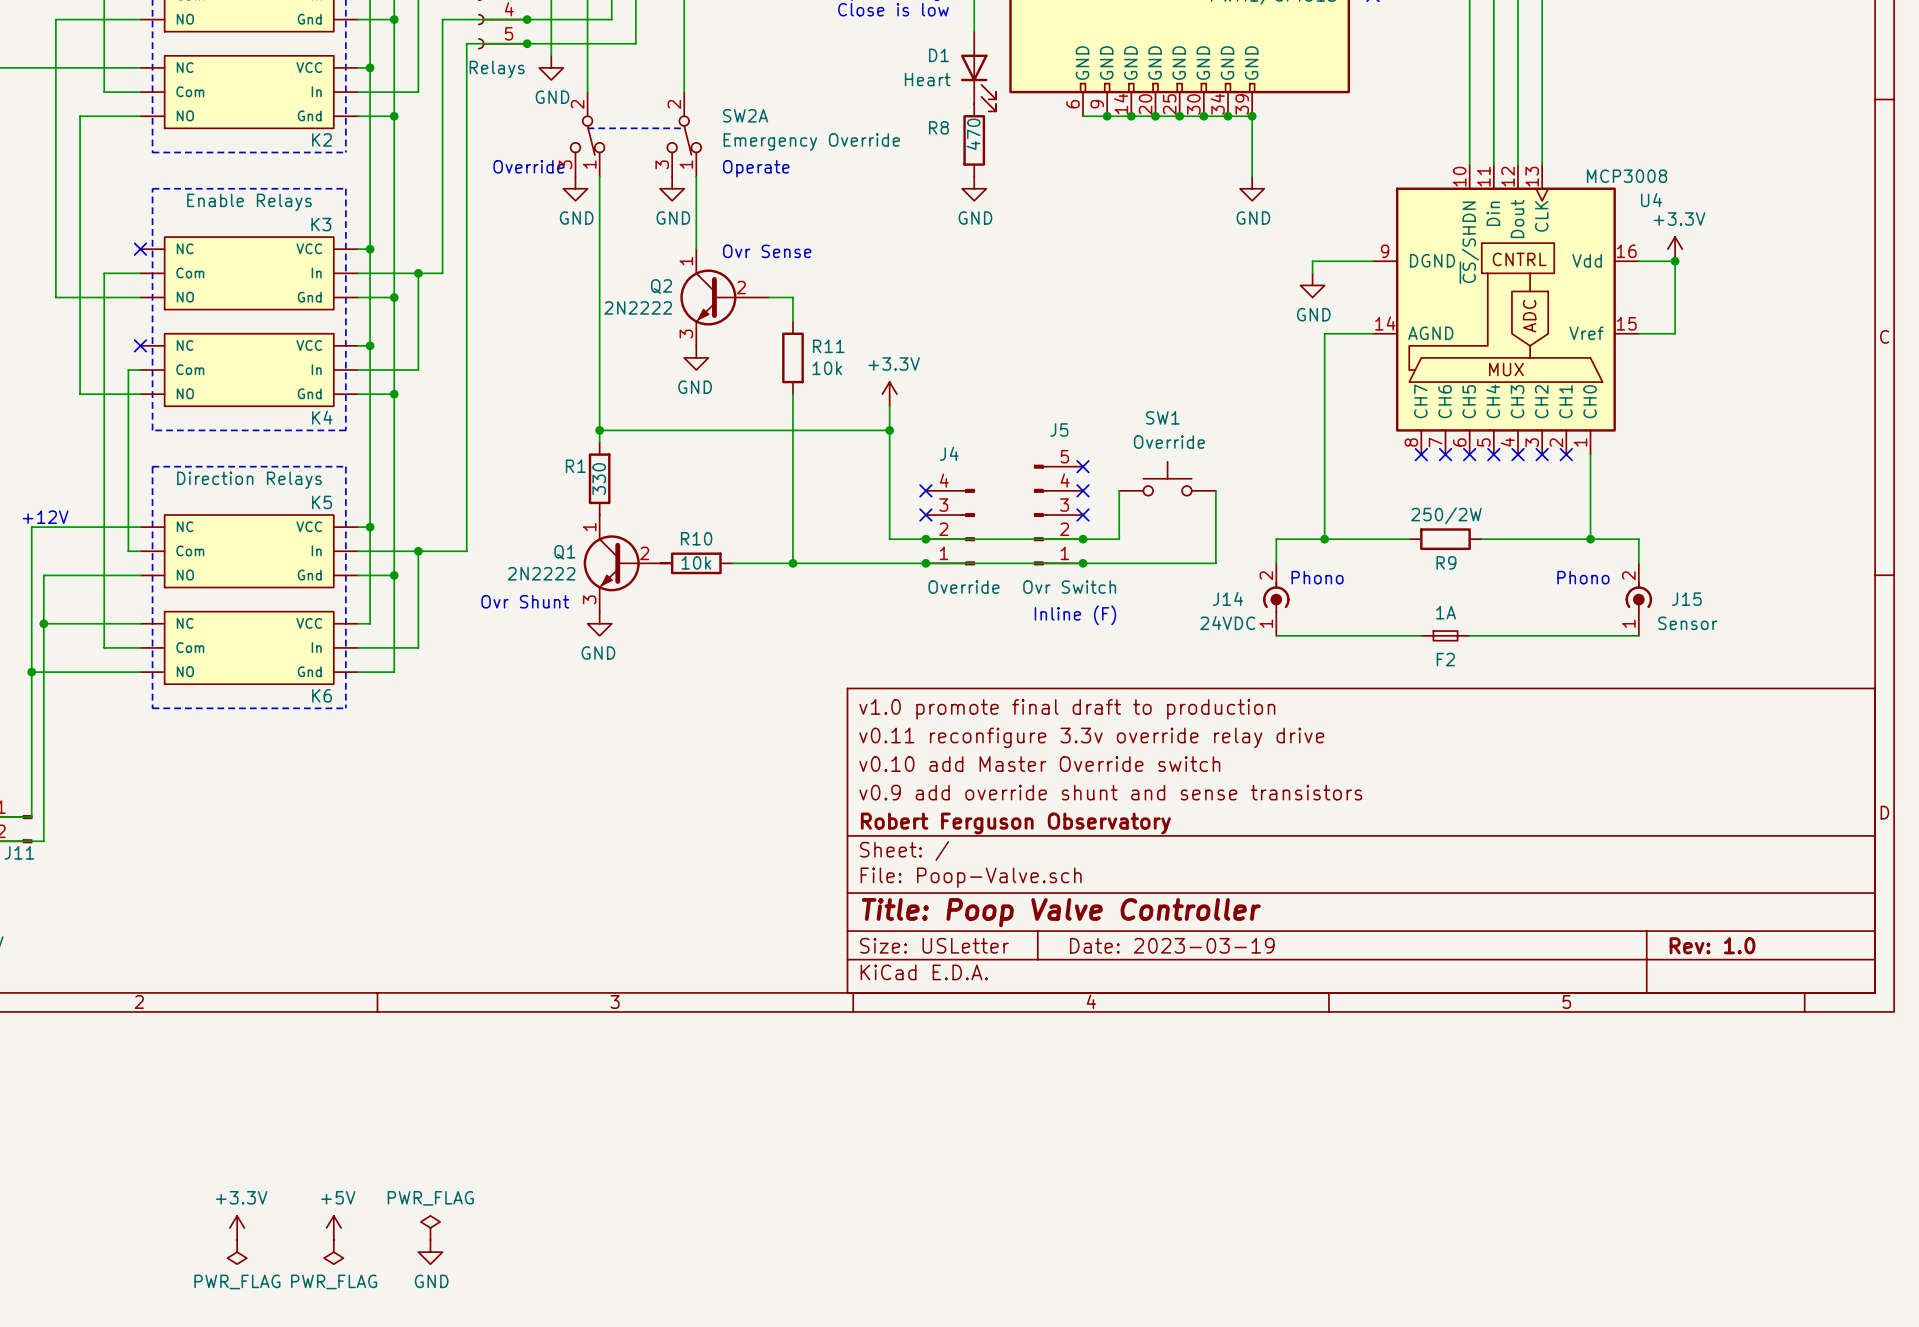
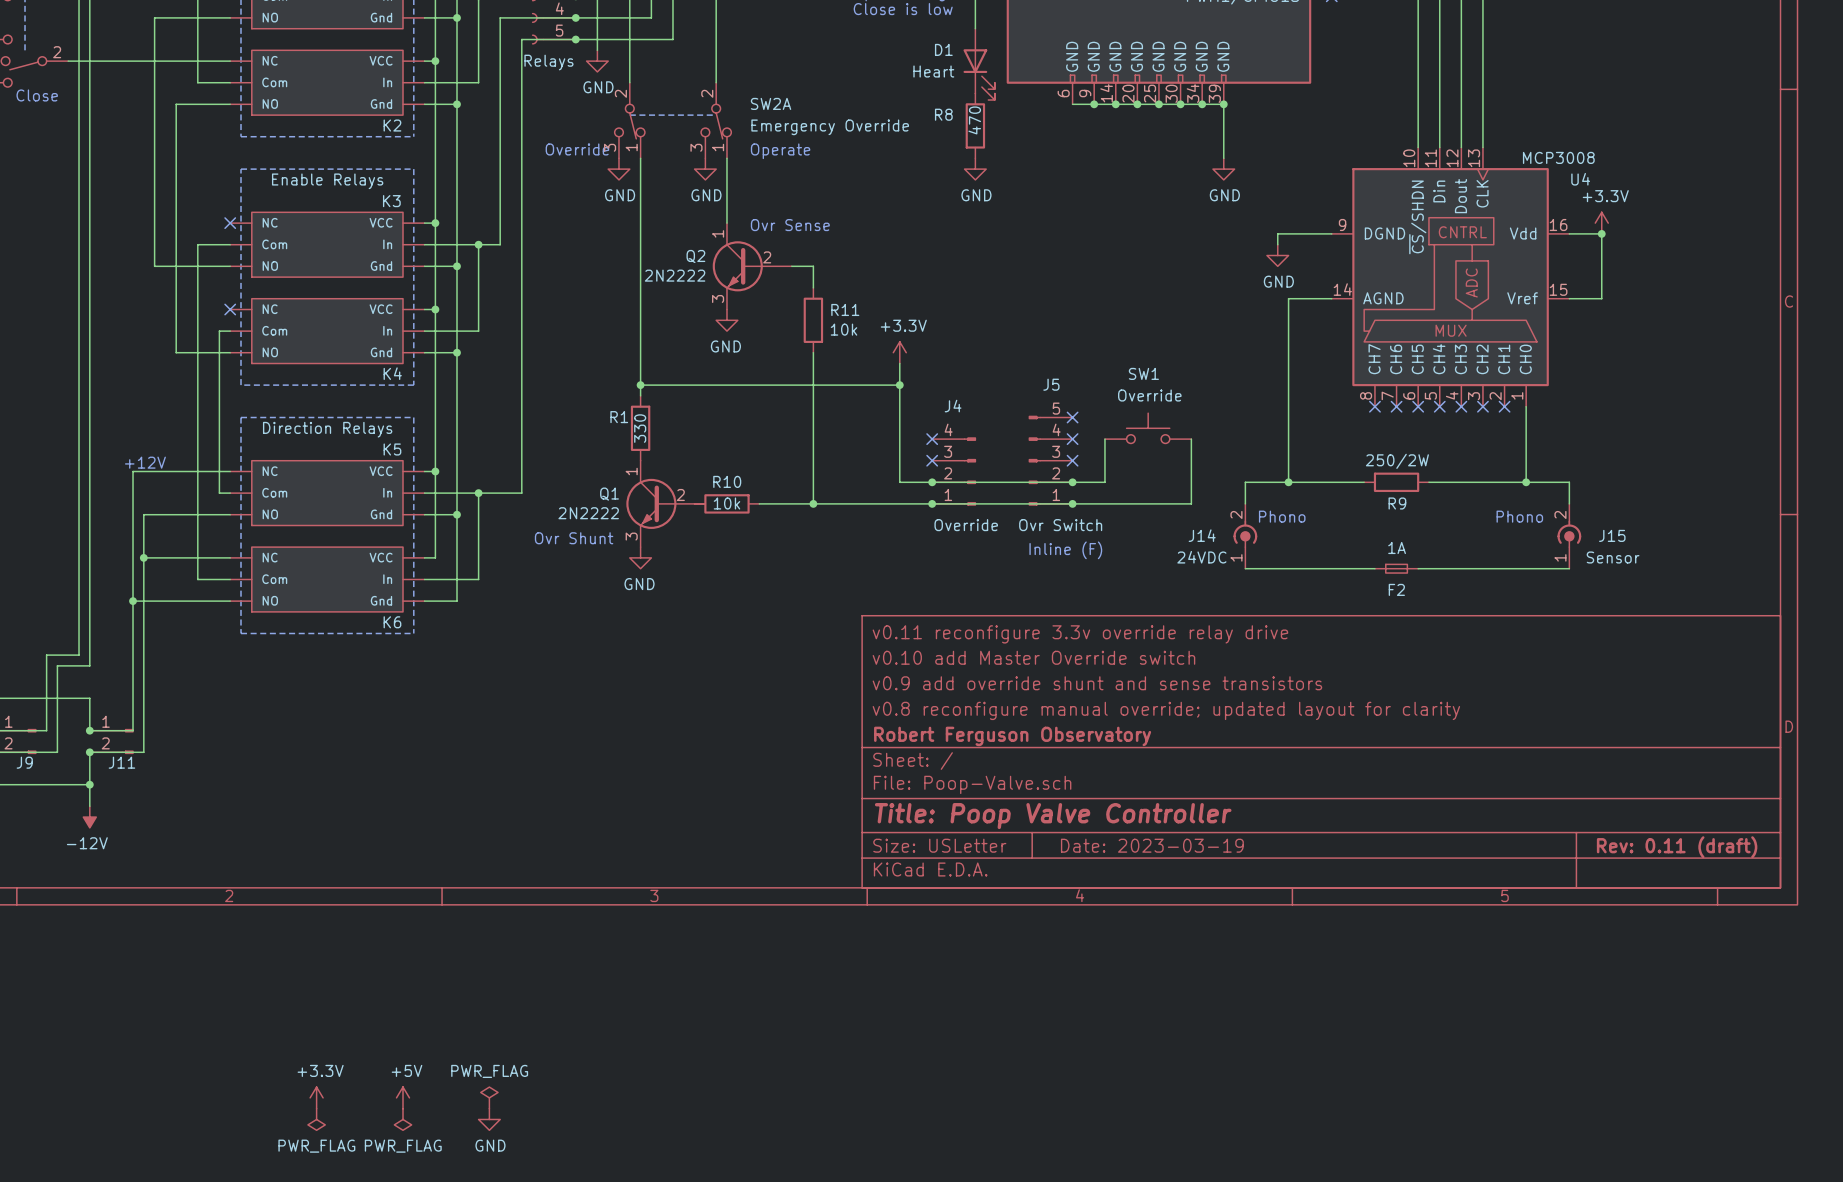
title block: v1.0 promote final draft to production (1067, 709) -> v0.11 reconfigure 3.3v override relay drive (1080, 634)
title block: v0.11 reconfigure 3.3v override relay drive (1091, 737) -> v0.10 add Master Override switch (1033, 657)
title block: v0.10 add Master Override switch (1039, 764) -> v0.9 add override shunt and sense transistors (1097, 683)
title block: v0.9 add override shunt and sense transistors (1110, 792) -> v0.8 reconfigure manual override; updated layout for clarity (1166, 710)
title block: Rev: 1.0 (1712, 945) -> Rev: 0.11 (draft) (1677, 847)

